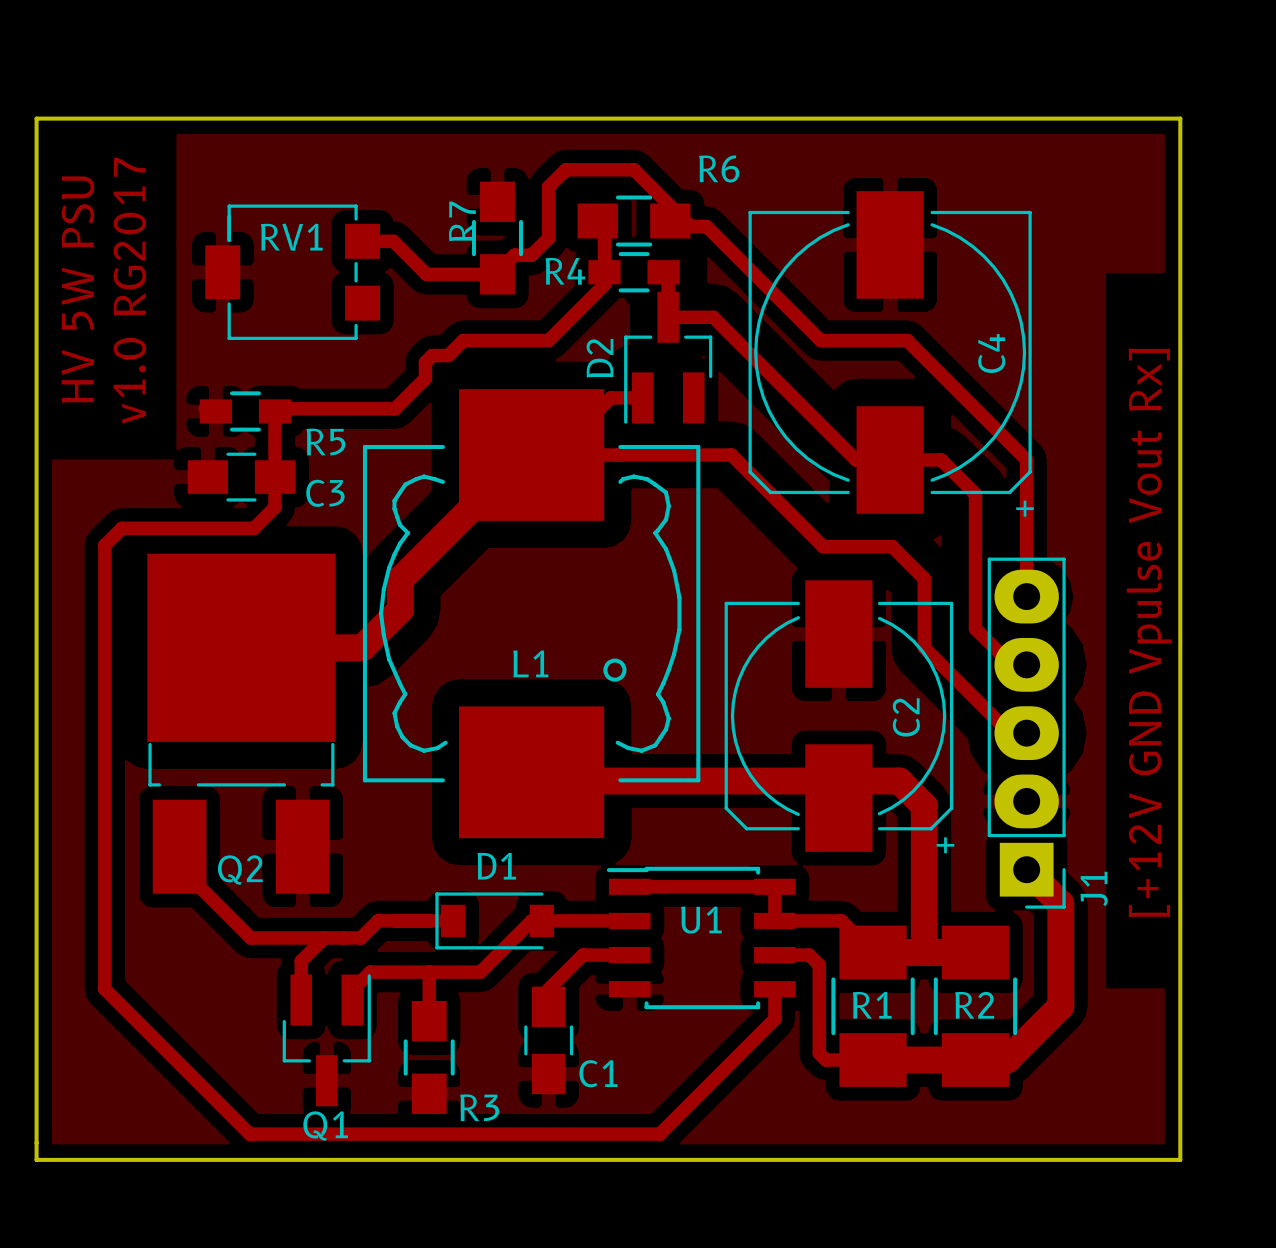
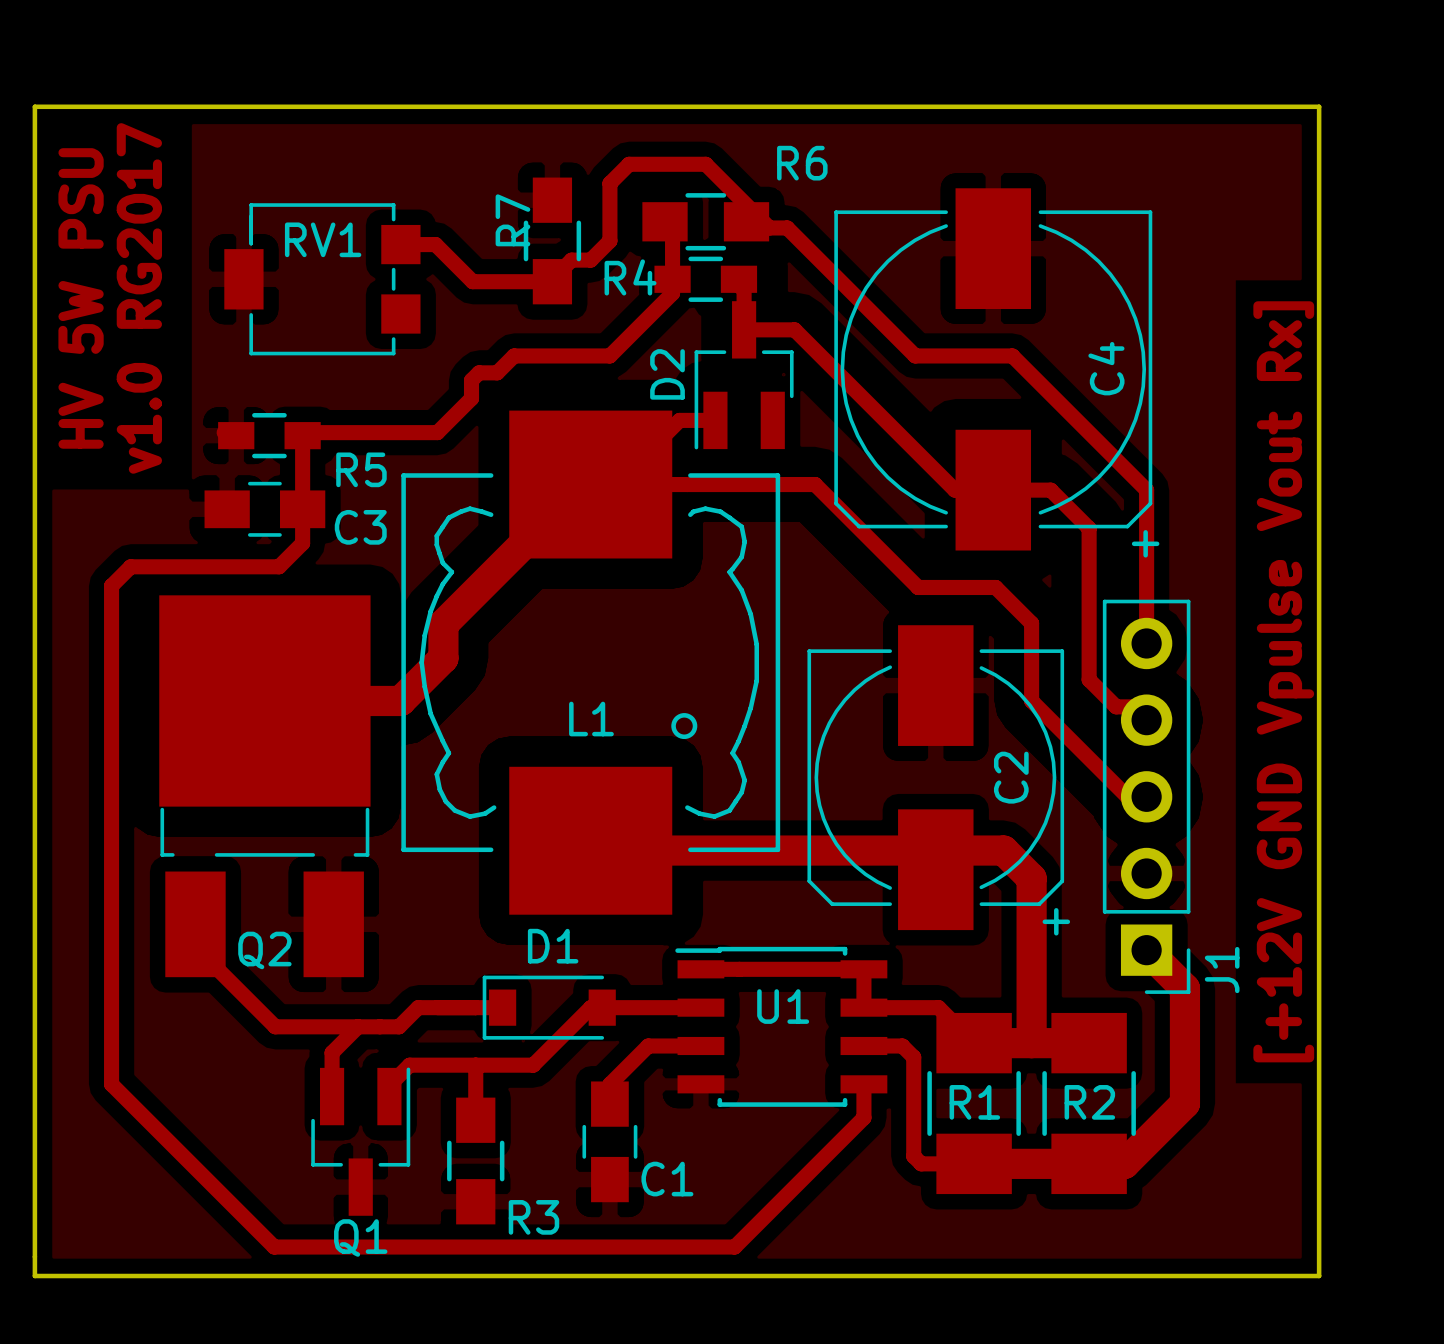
J1 footprint: [987, 557, 1066, 909] -> [1102, 599, 1191, 994]

